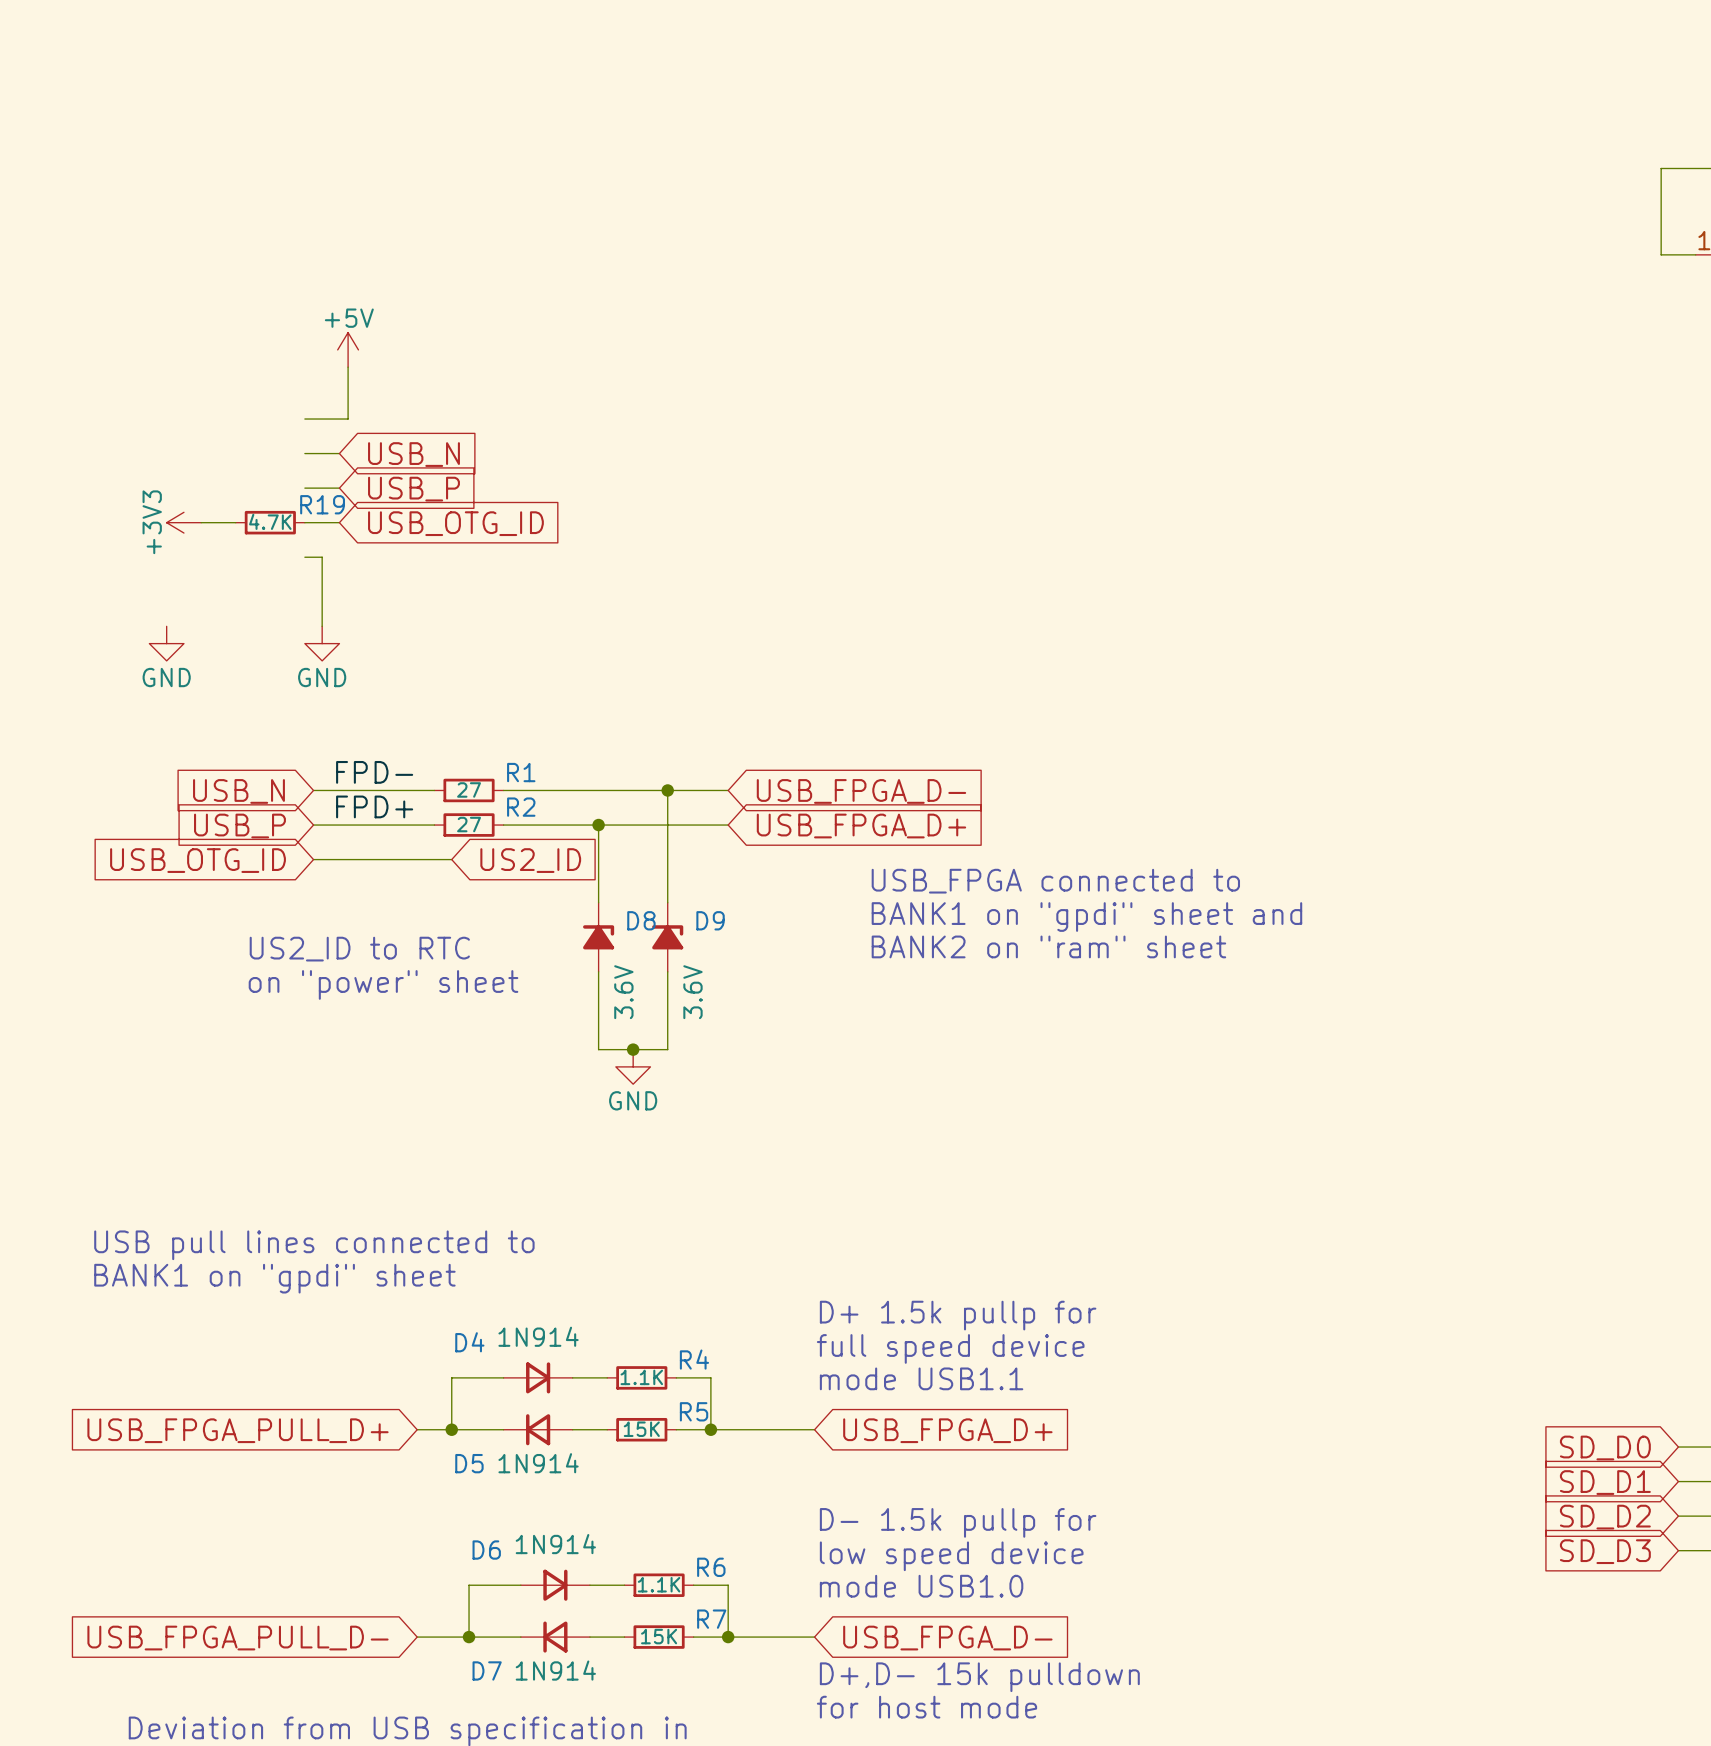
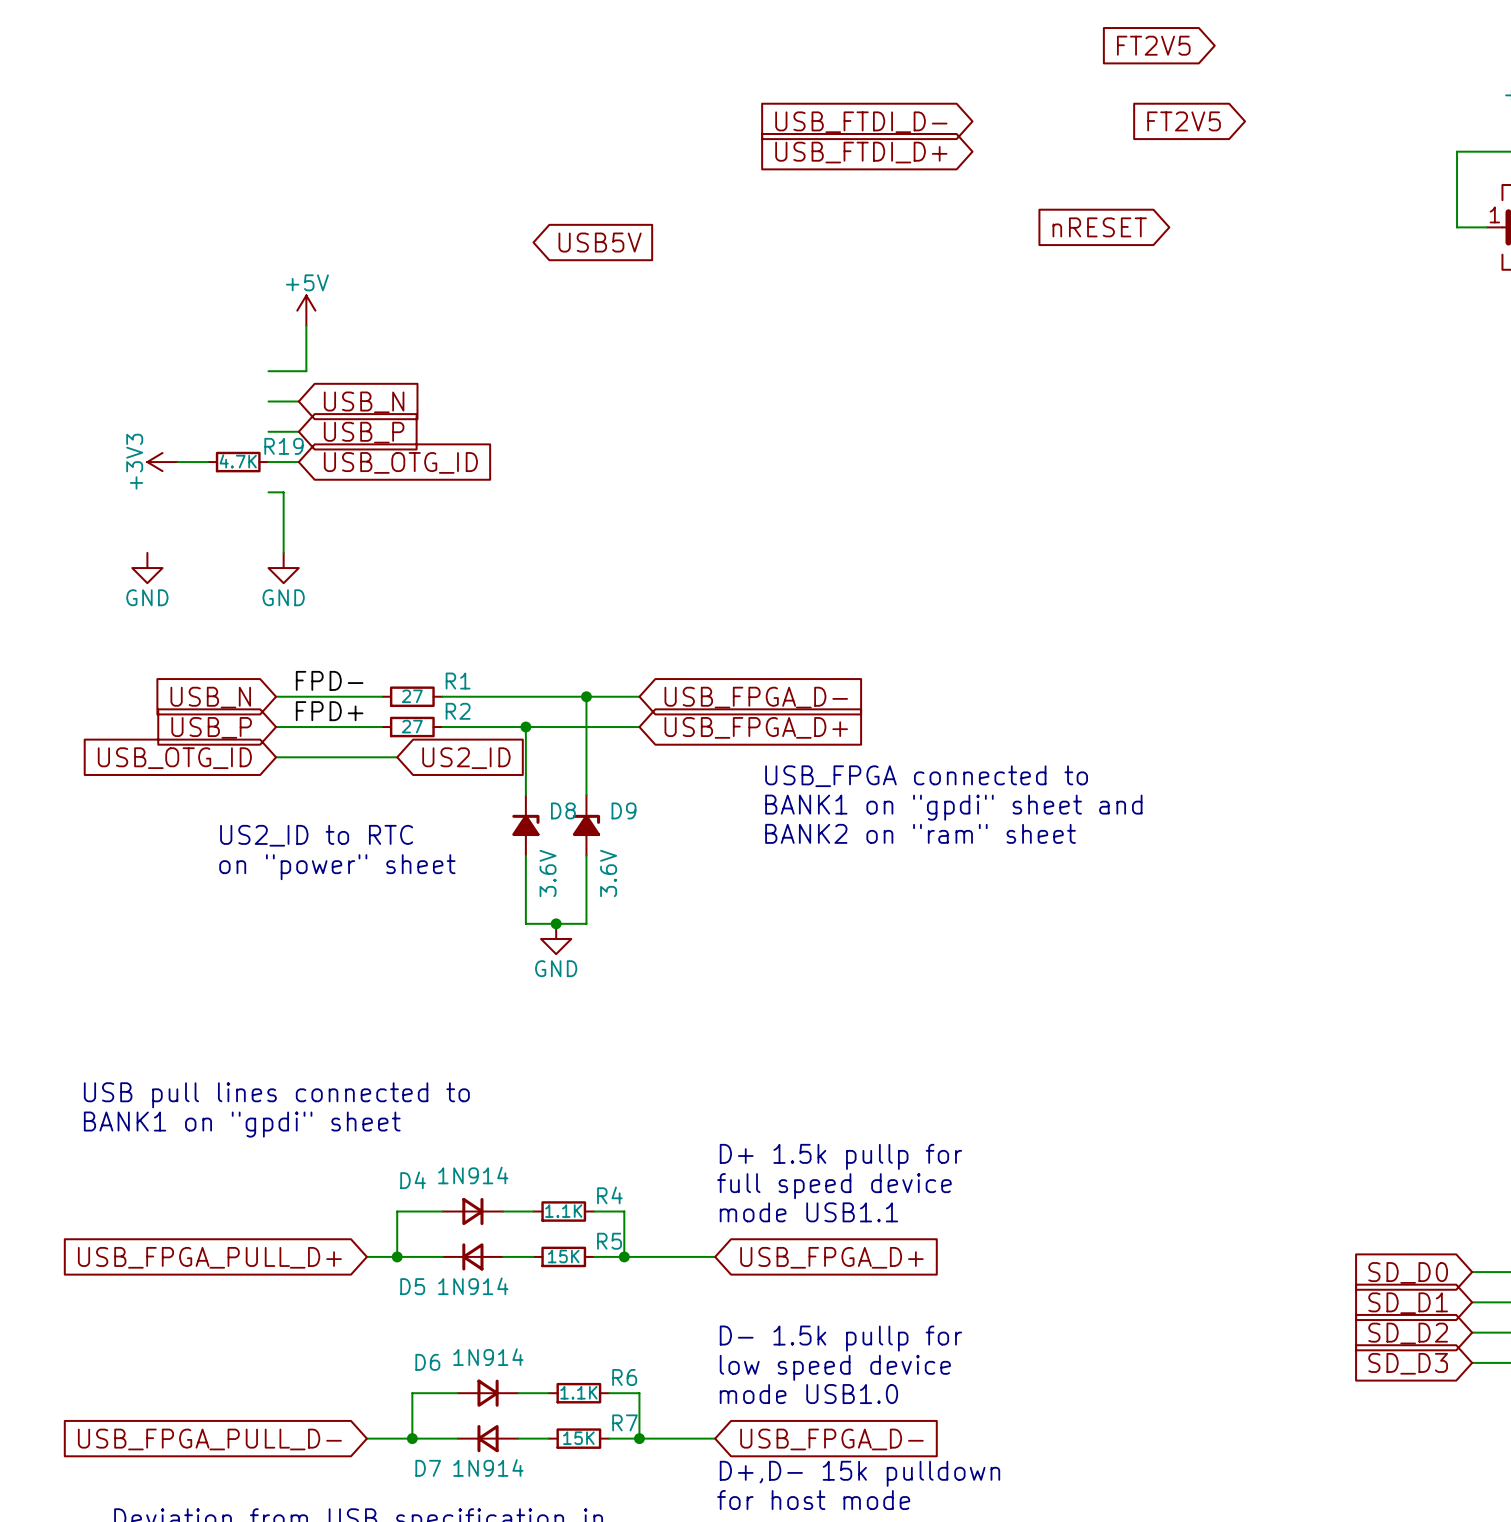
global label: none -> FT2V5 (1153, 45)
global label: none -> FT2V5 (1184, 121)
global label: none -> USB_FTDI_D- (861, 122)
global label: none -> USB_FTDI_D+ (861, 152)
global label: none -> nRESET (1099, 227)
global label: none -> USB5V (600, 242)

